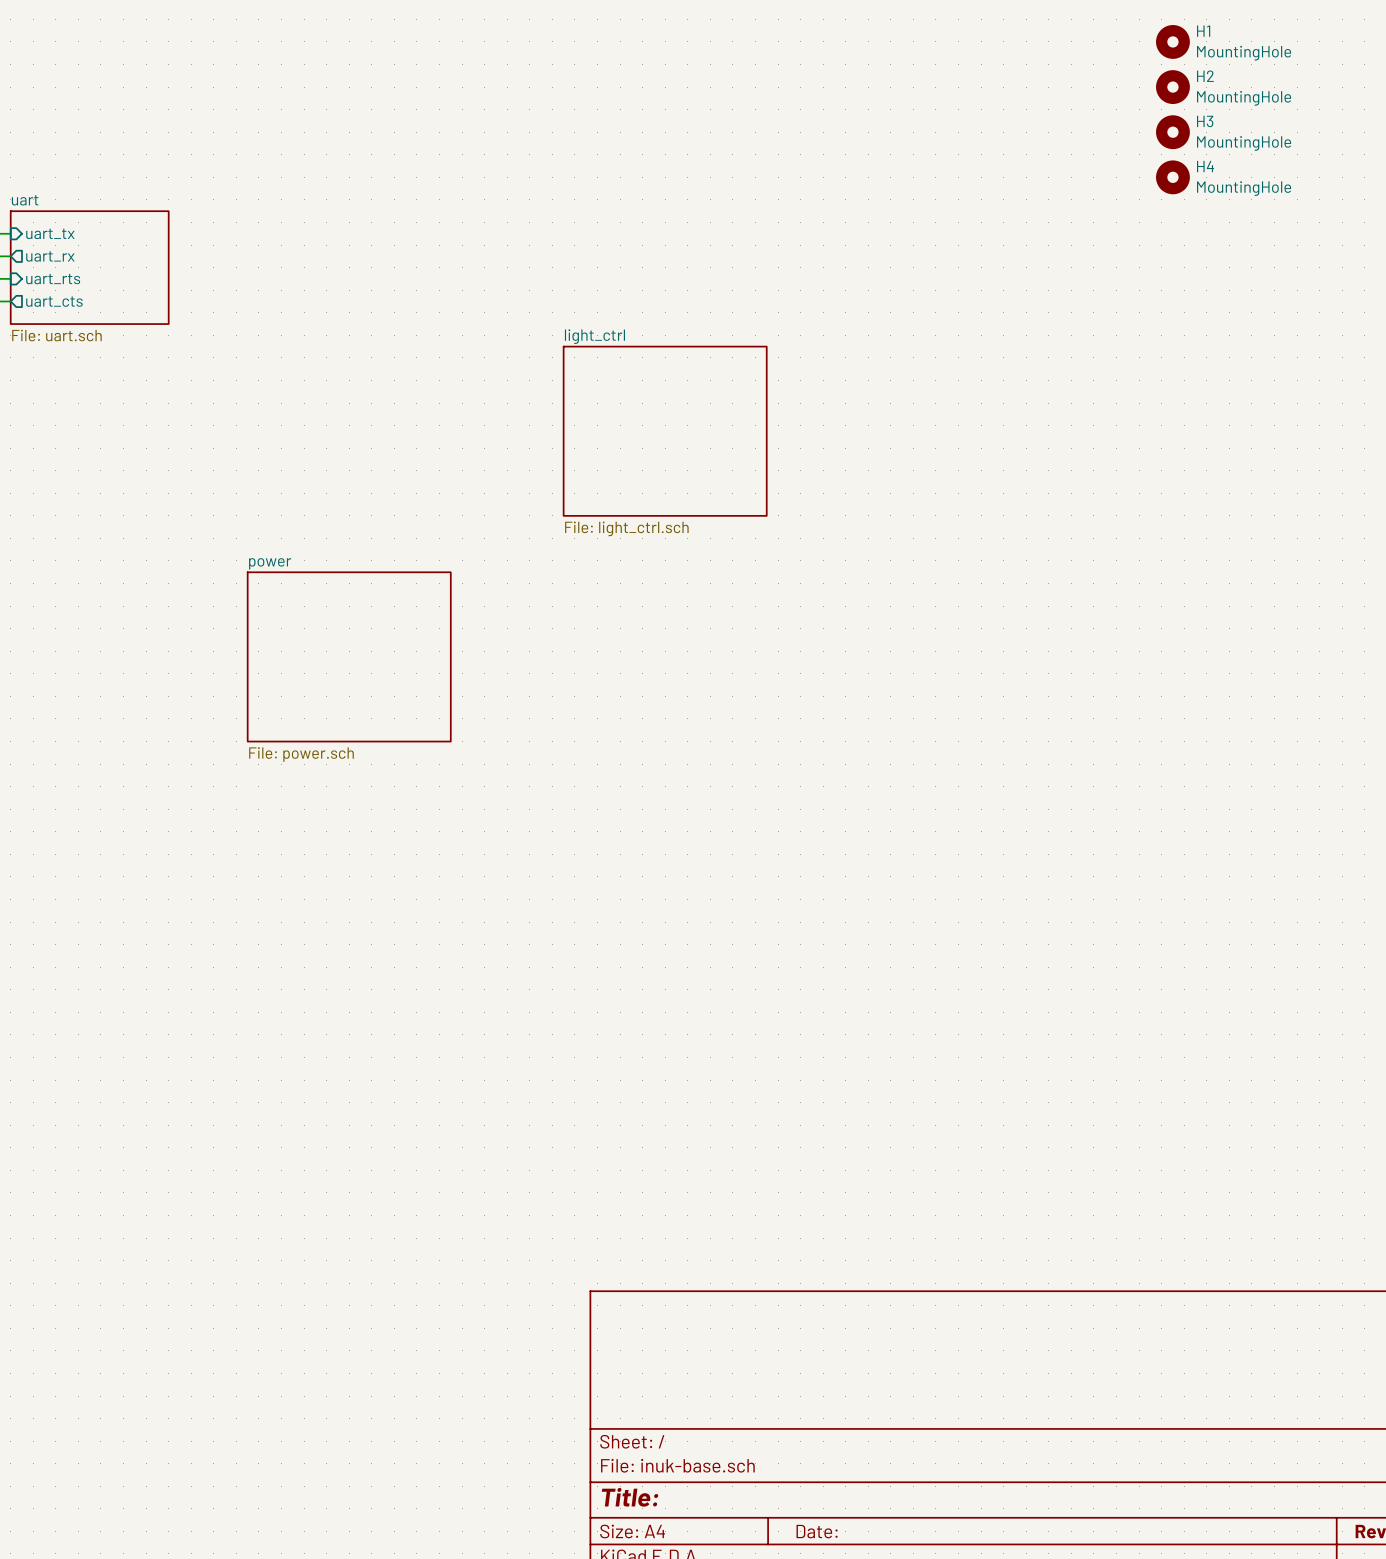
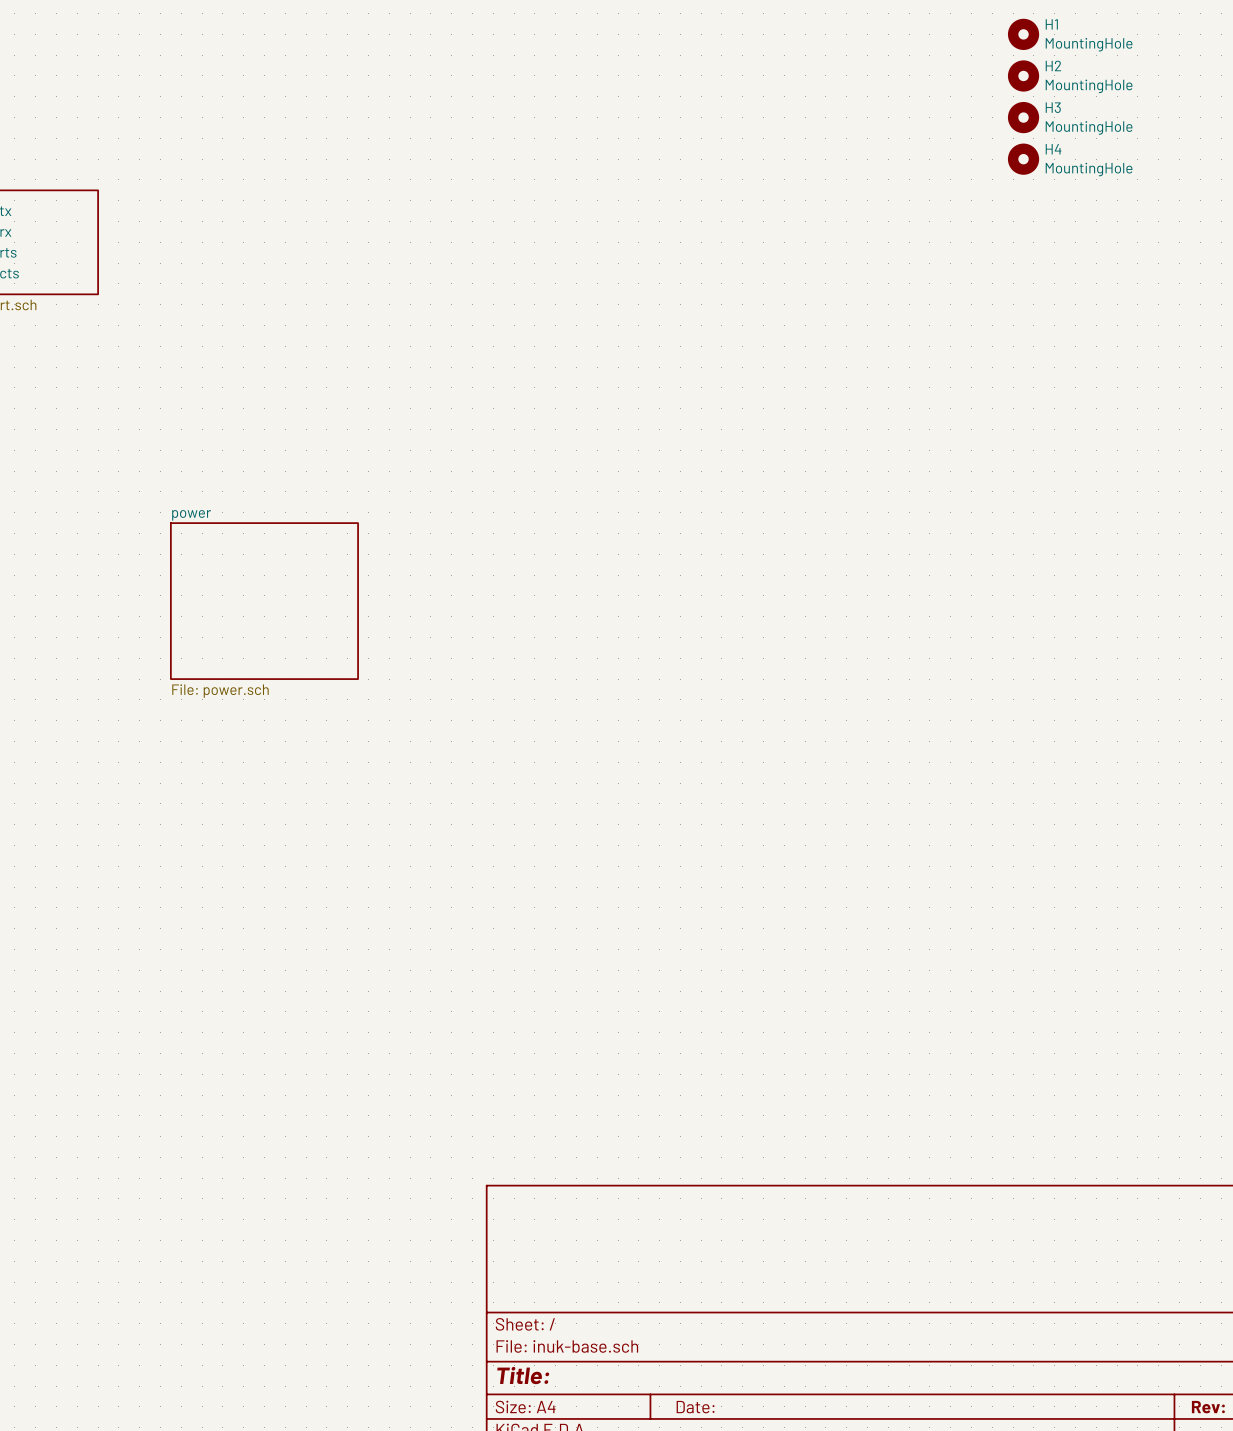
sheet light_ctrl: File: light_ctrl.sch (665, 431) -> none

